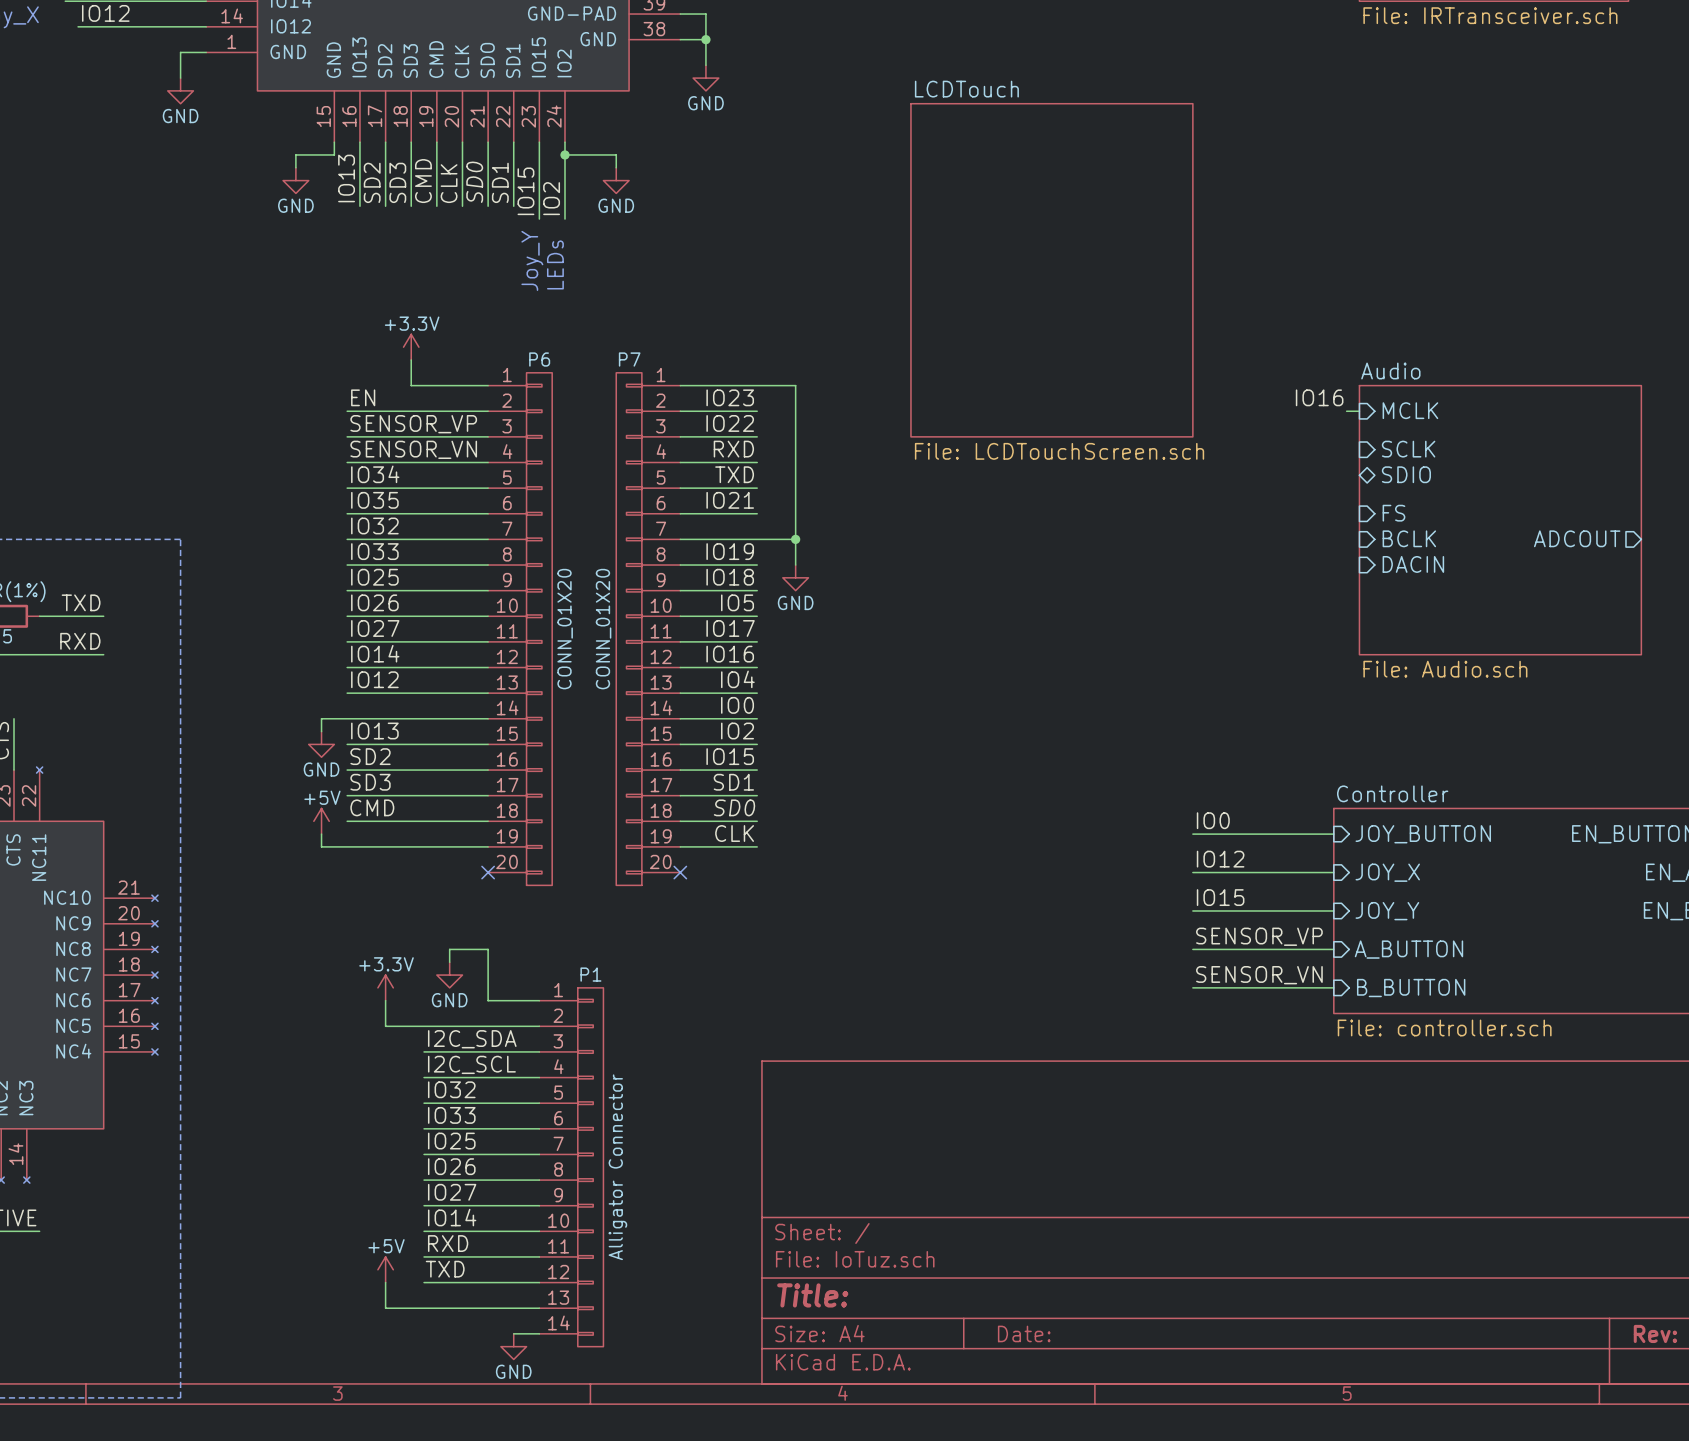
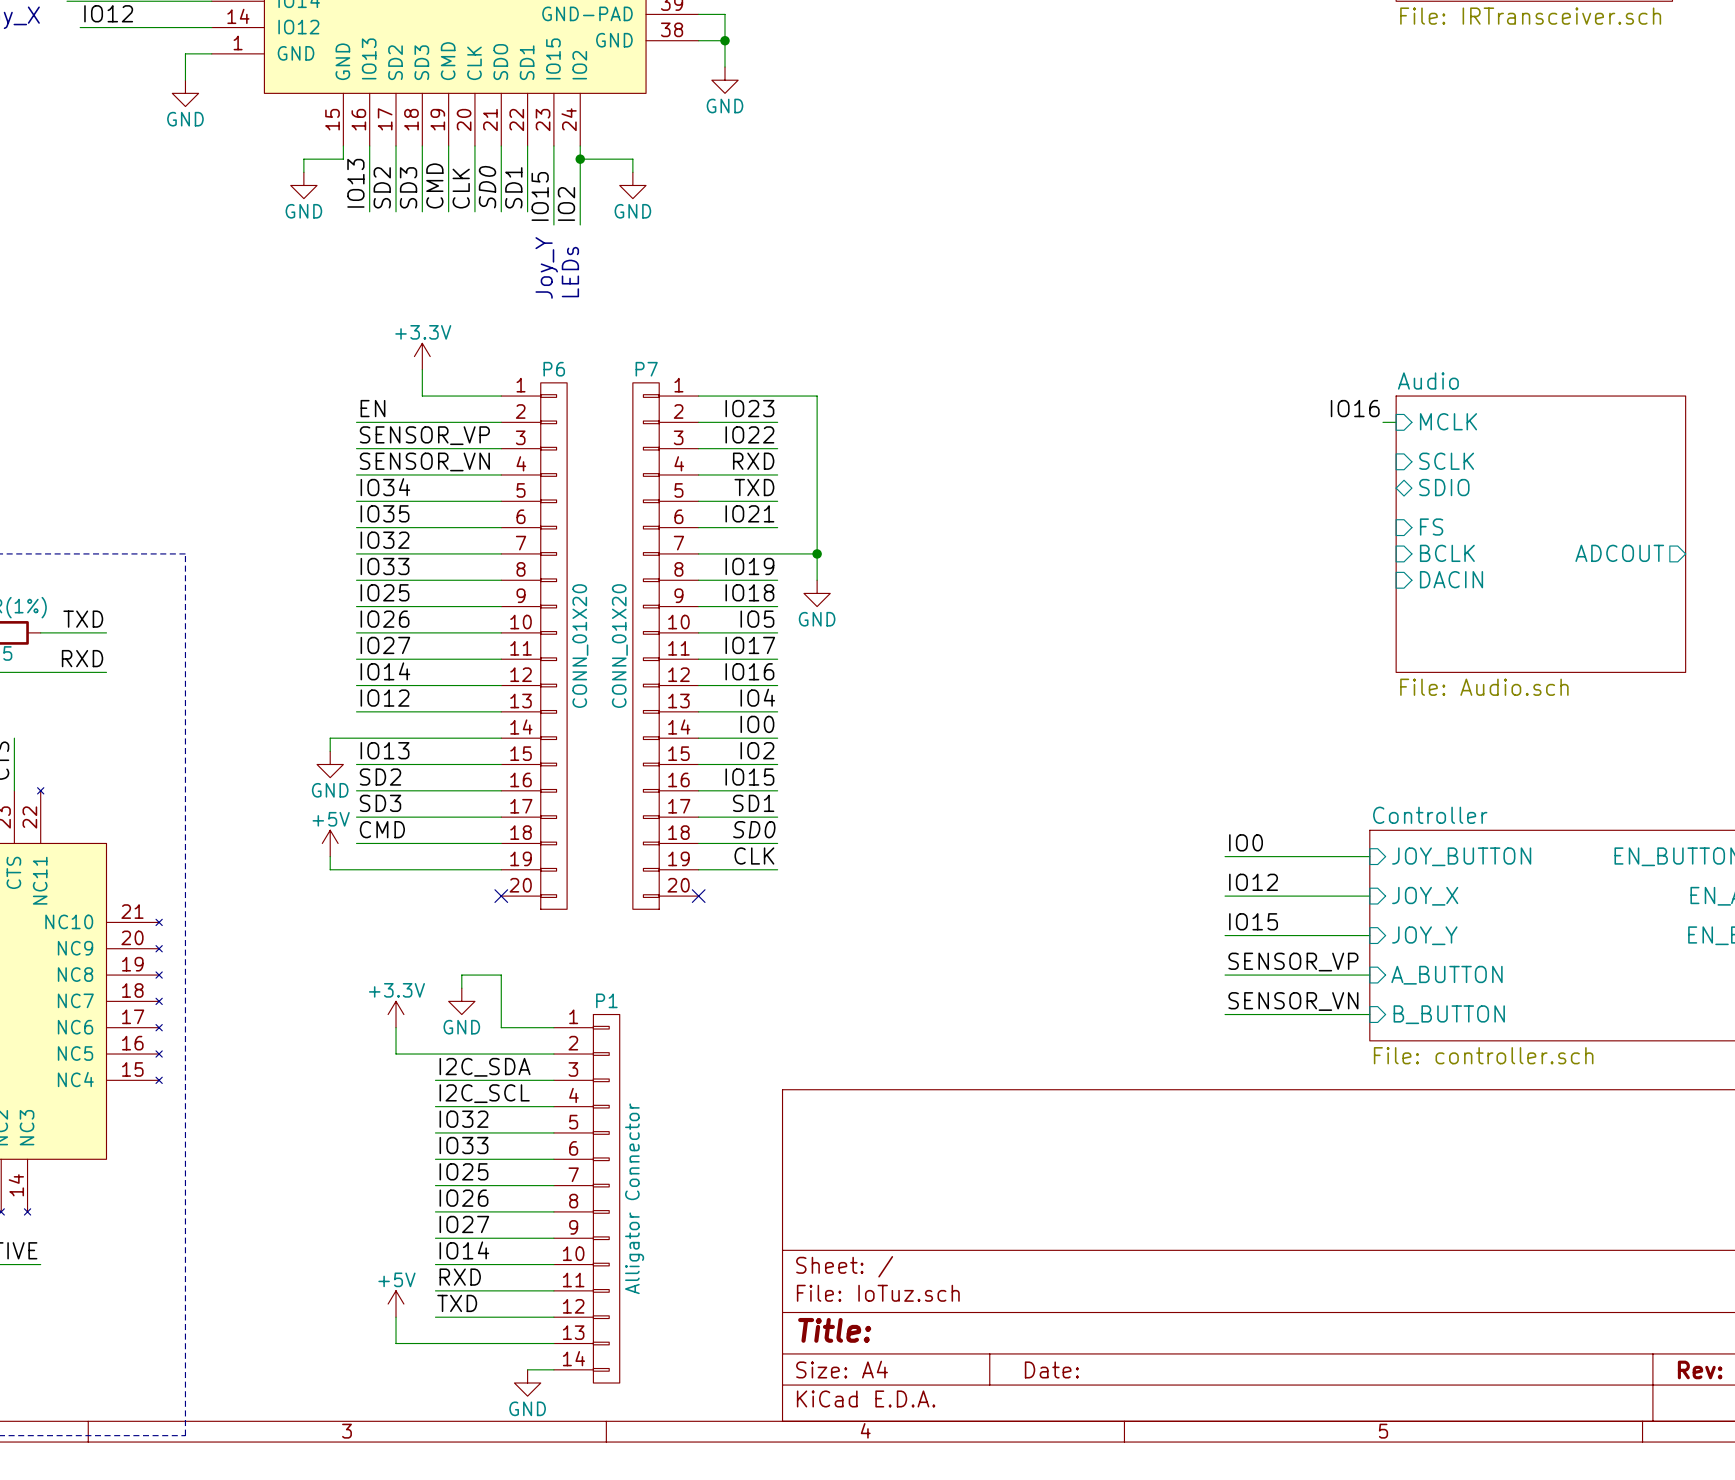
sheet LCDTouch: File: LCDTouchScreen.sch (1051, 270) -> none

